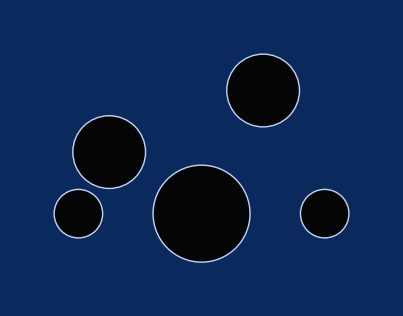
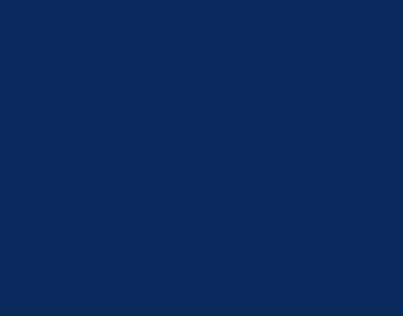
part: (201, 158) -> none

